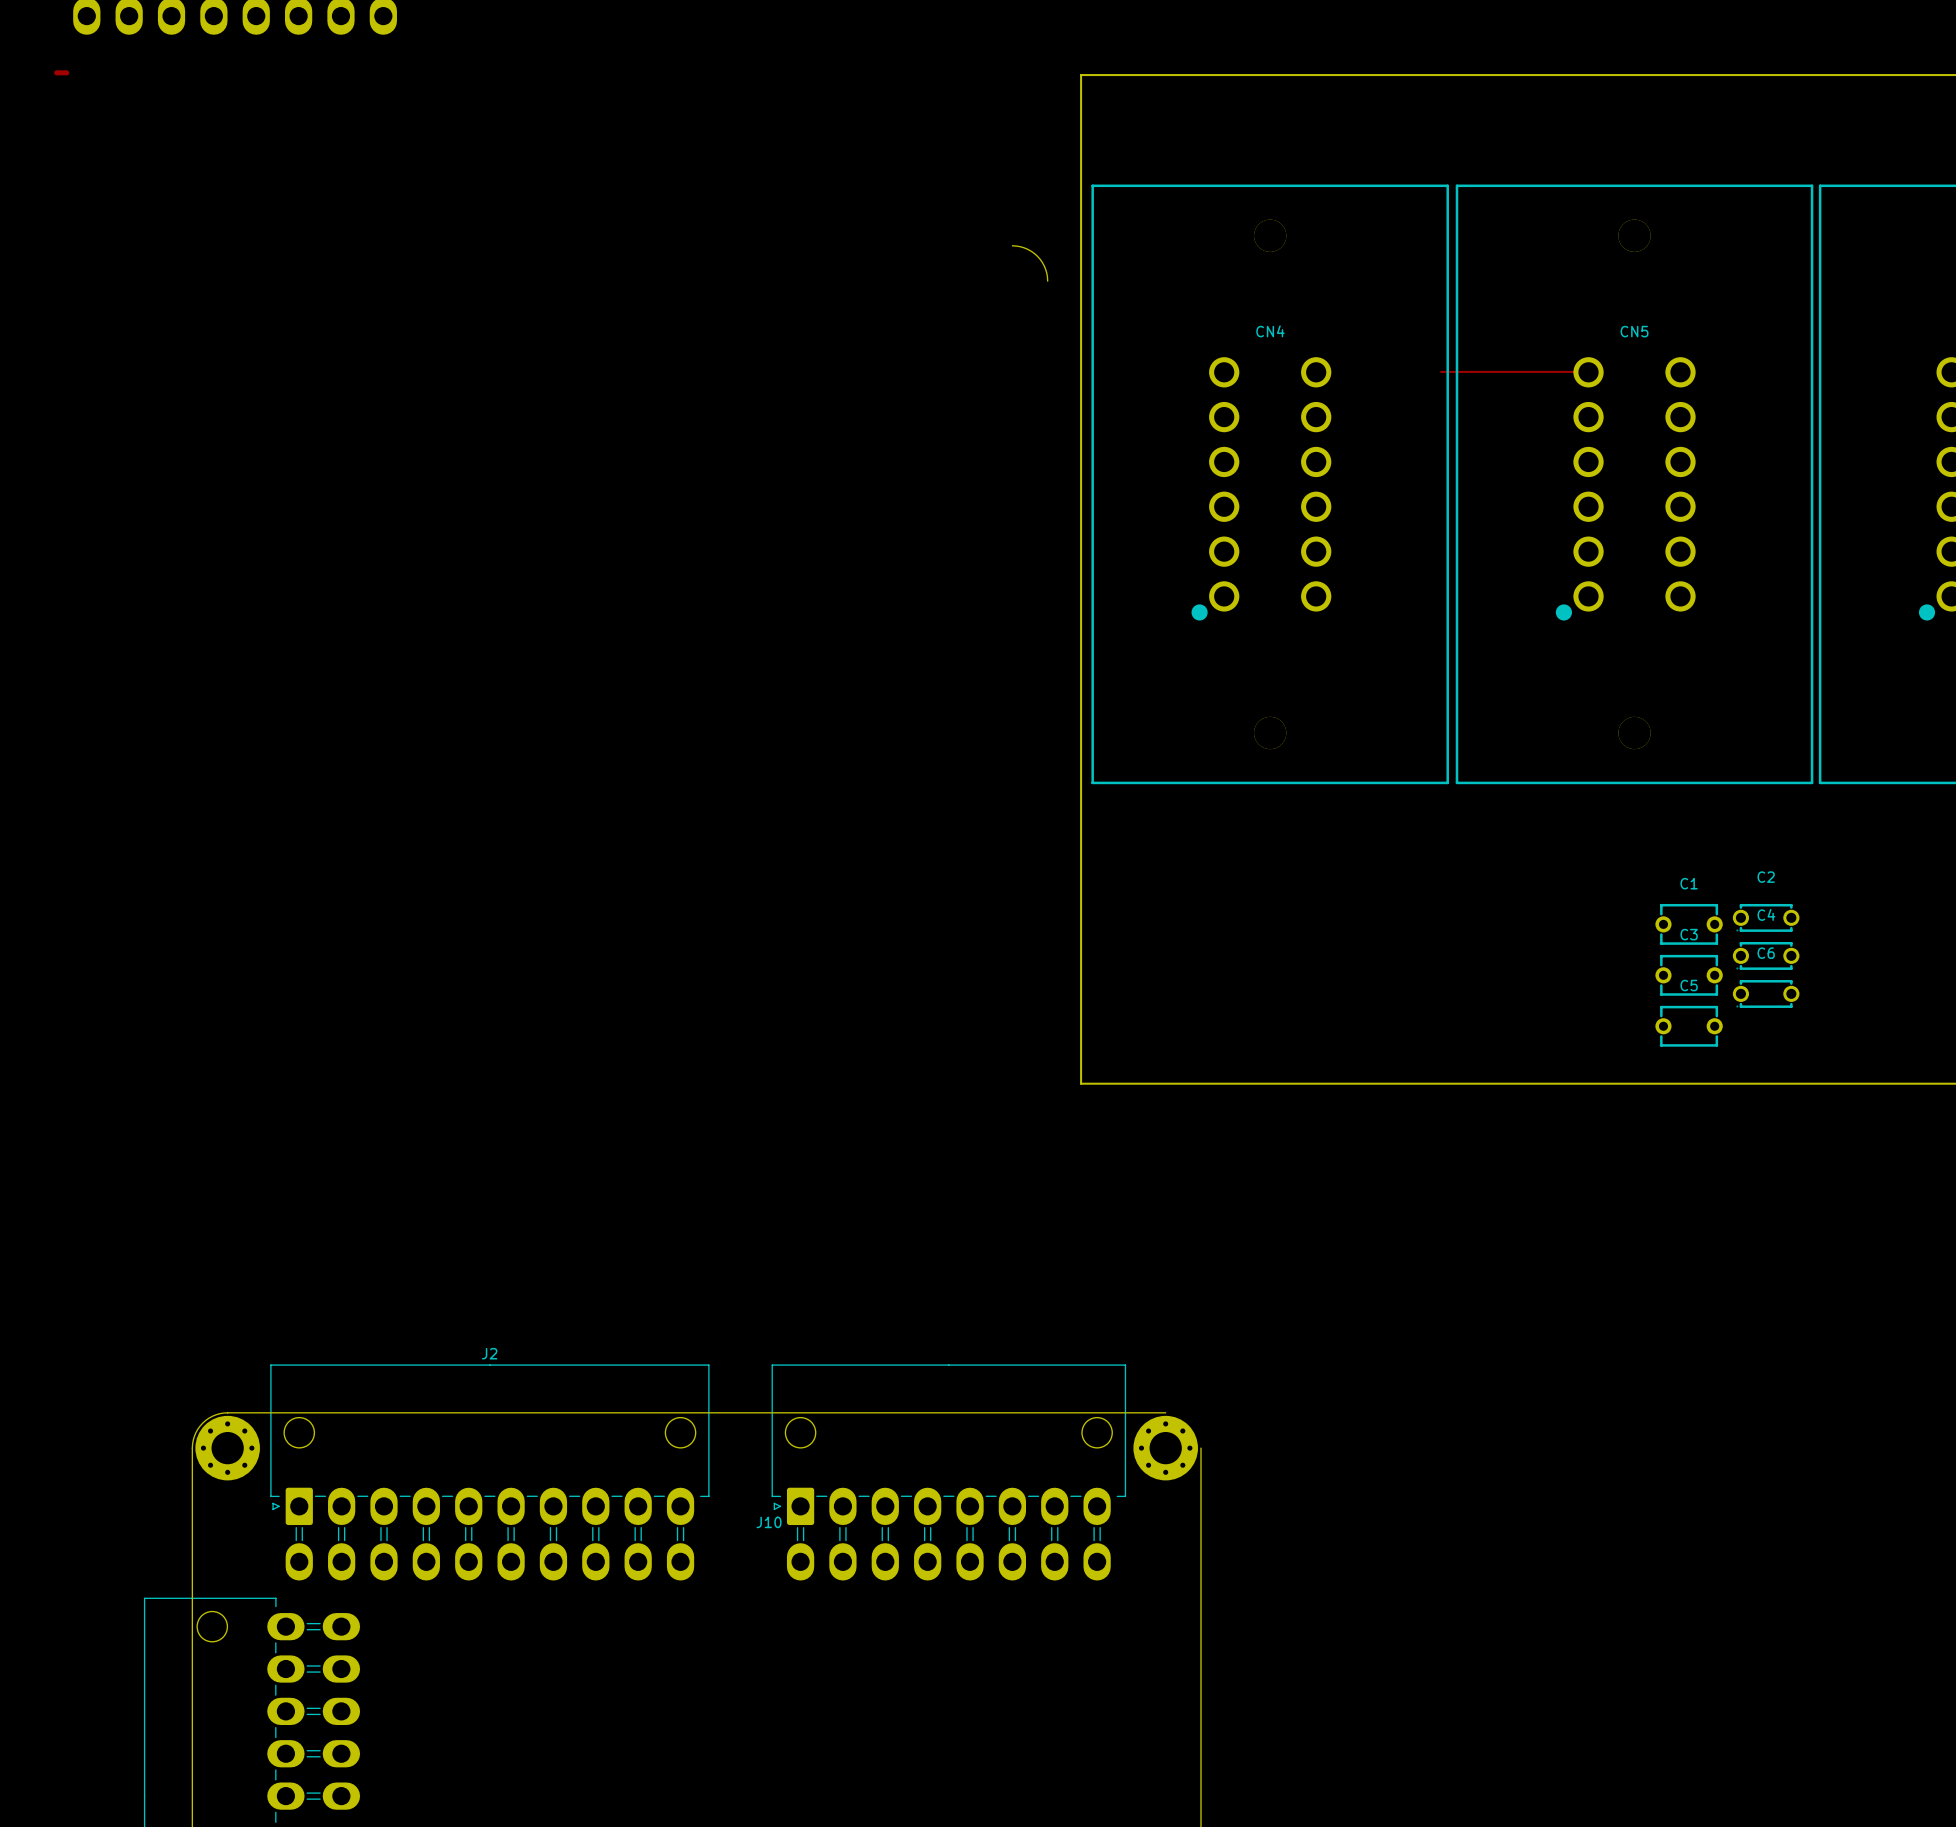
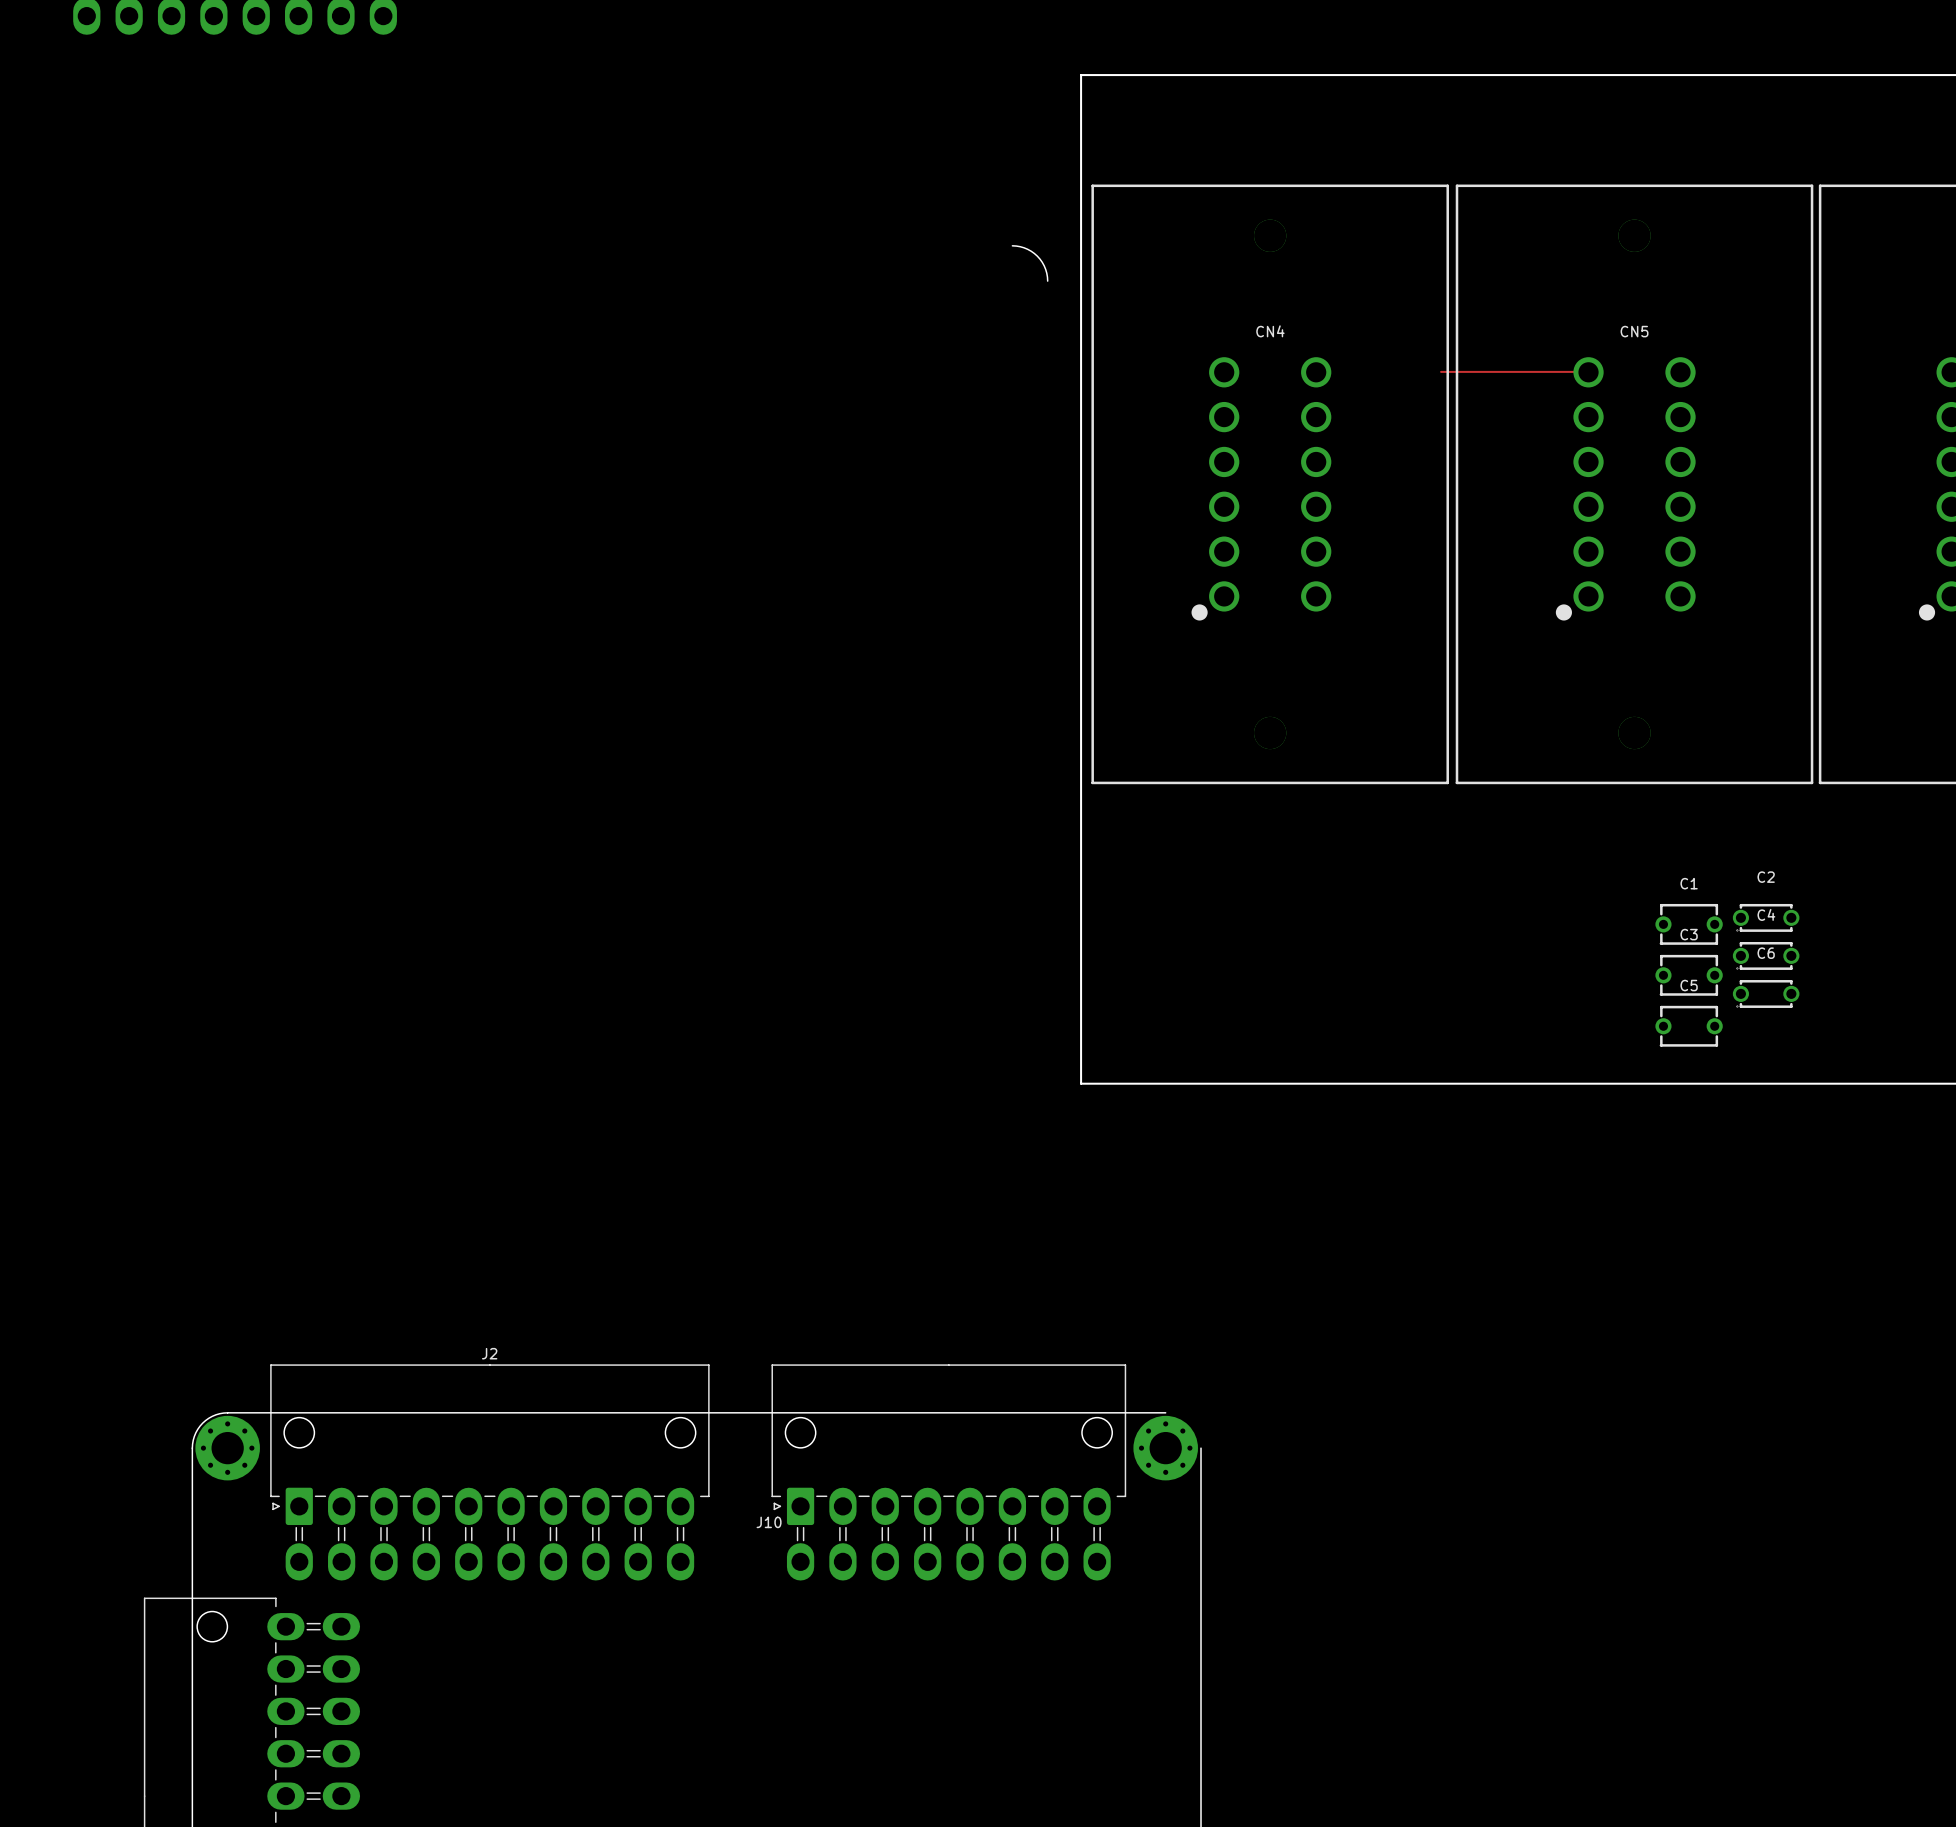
part: (61, 72) -> none

